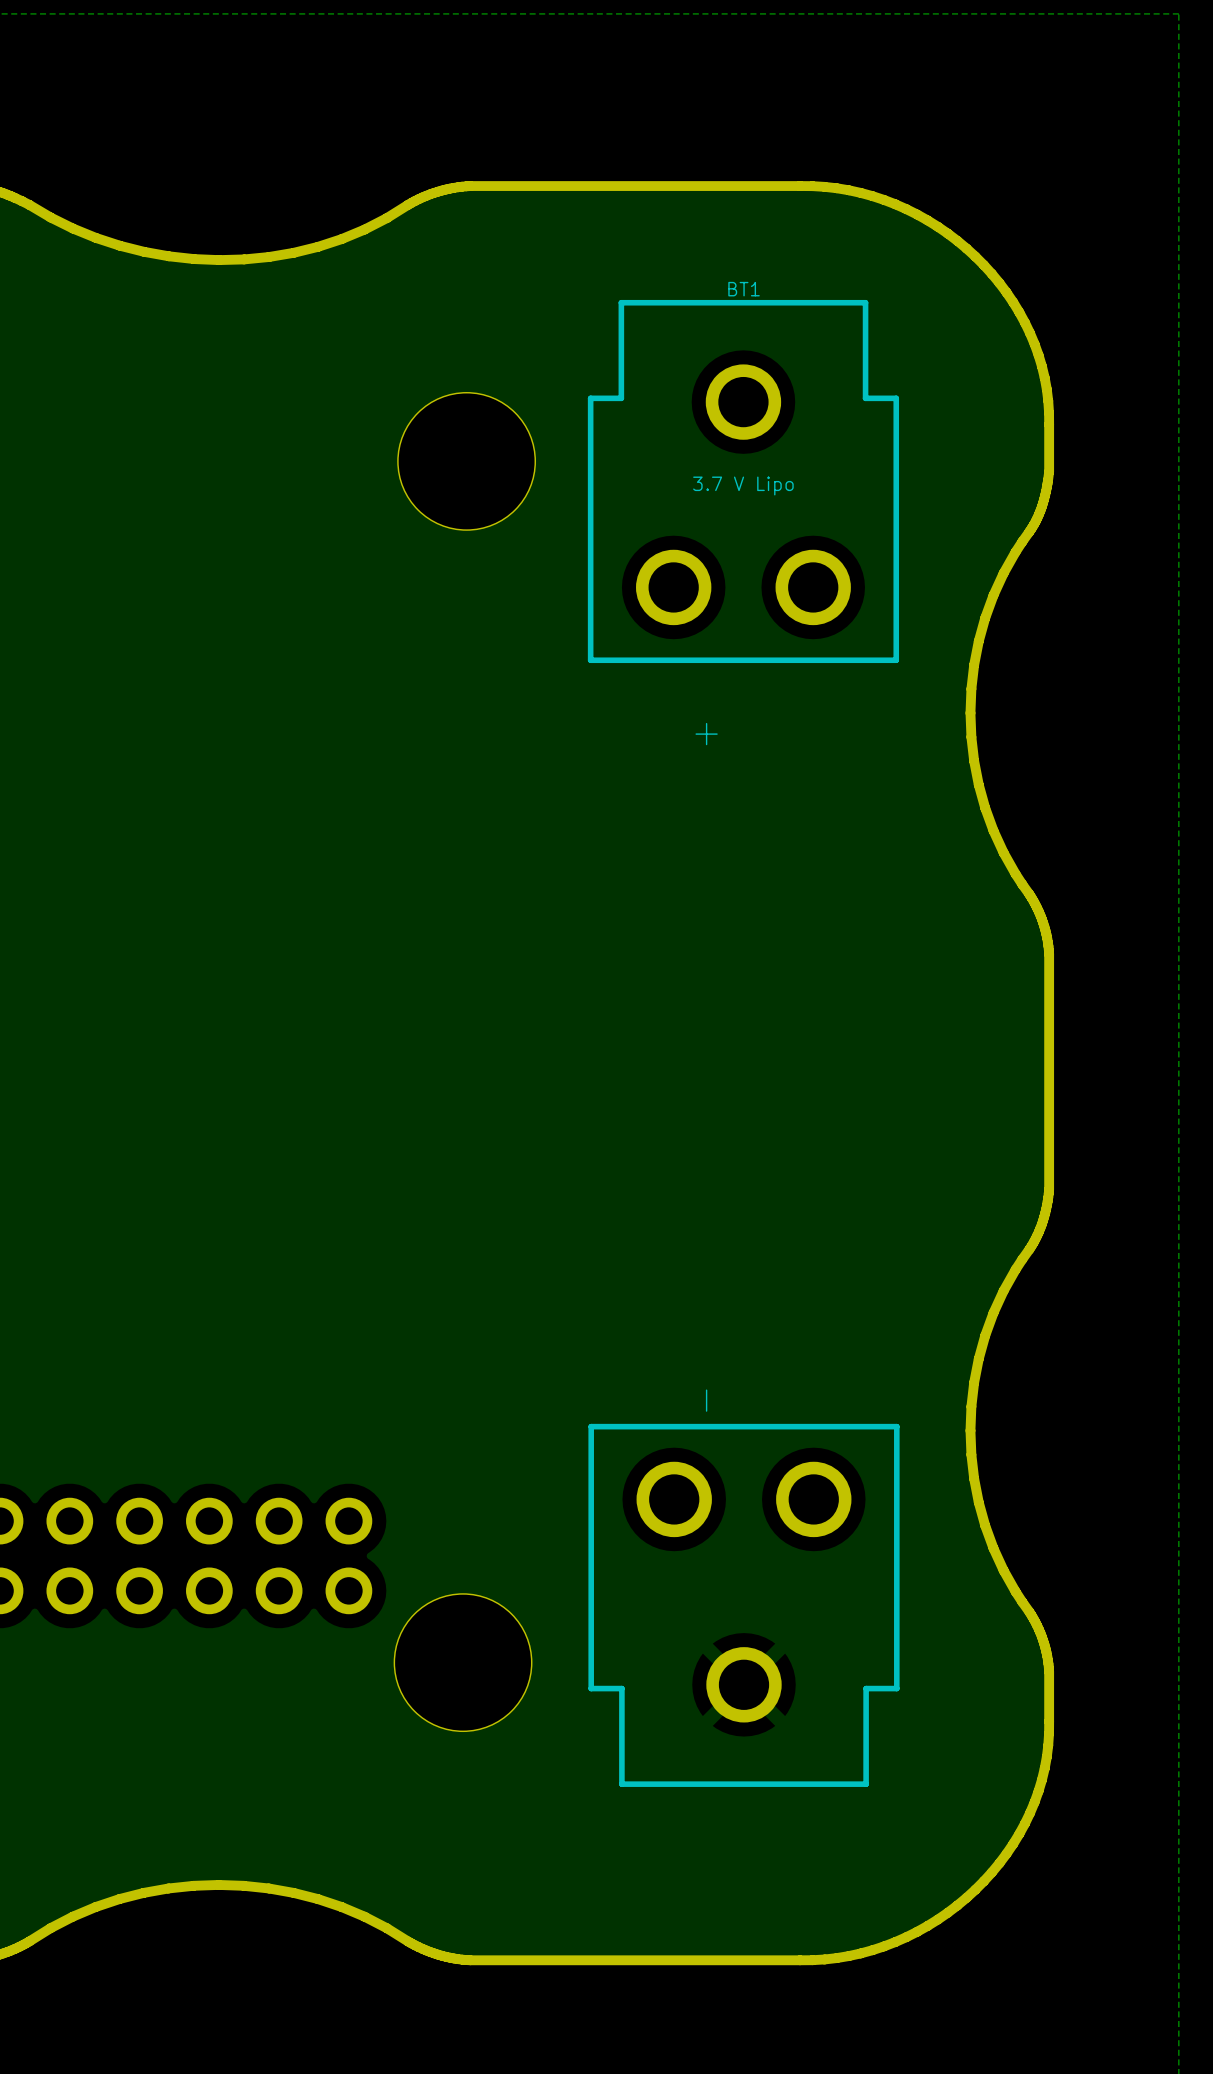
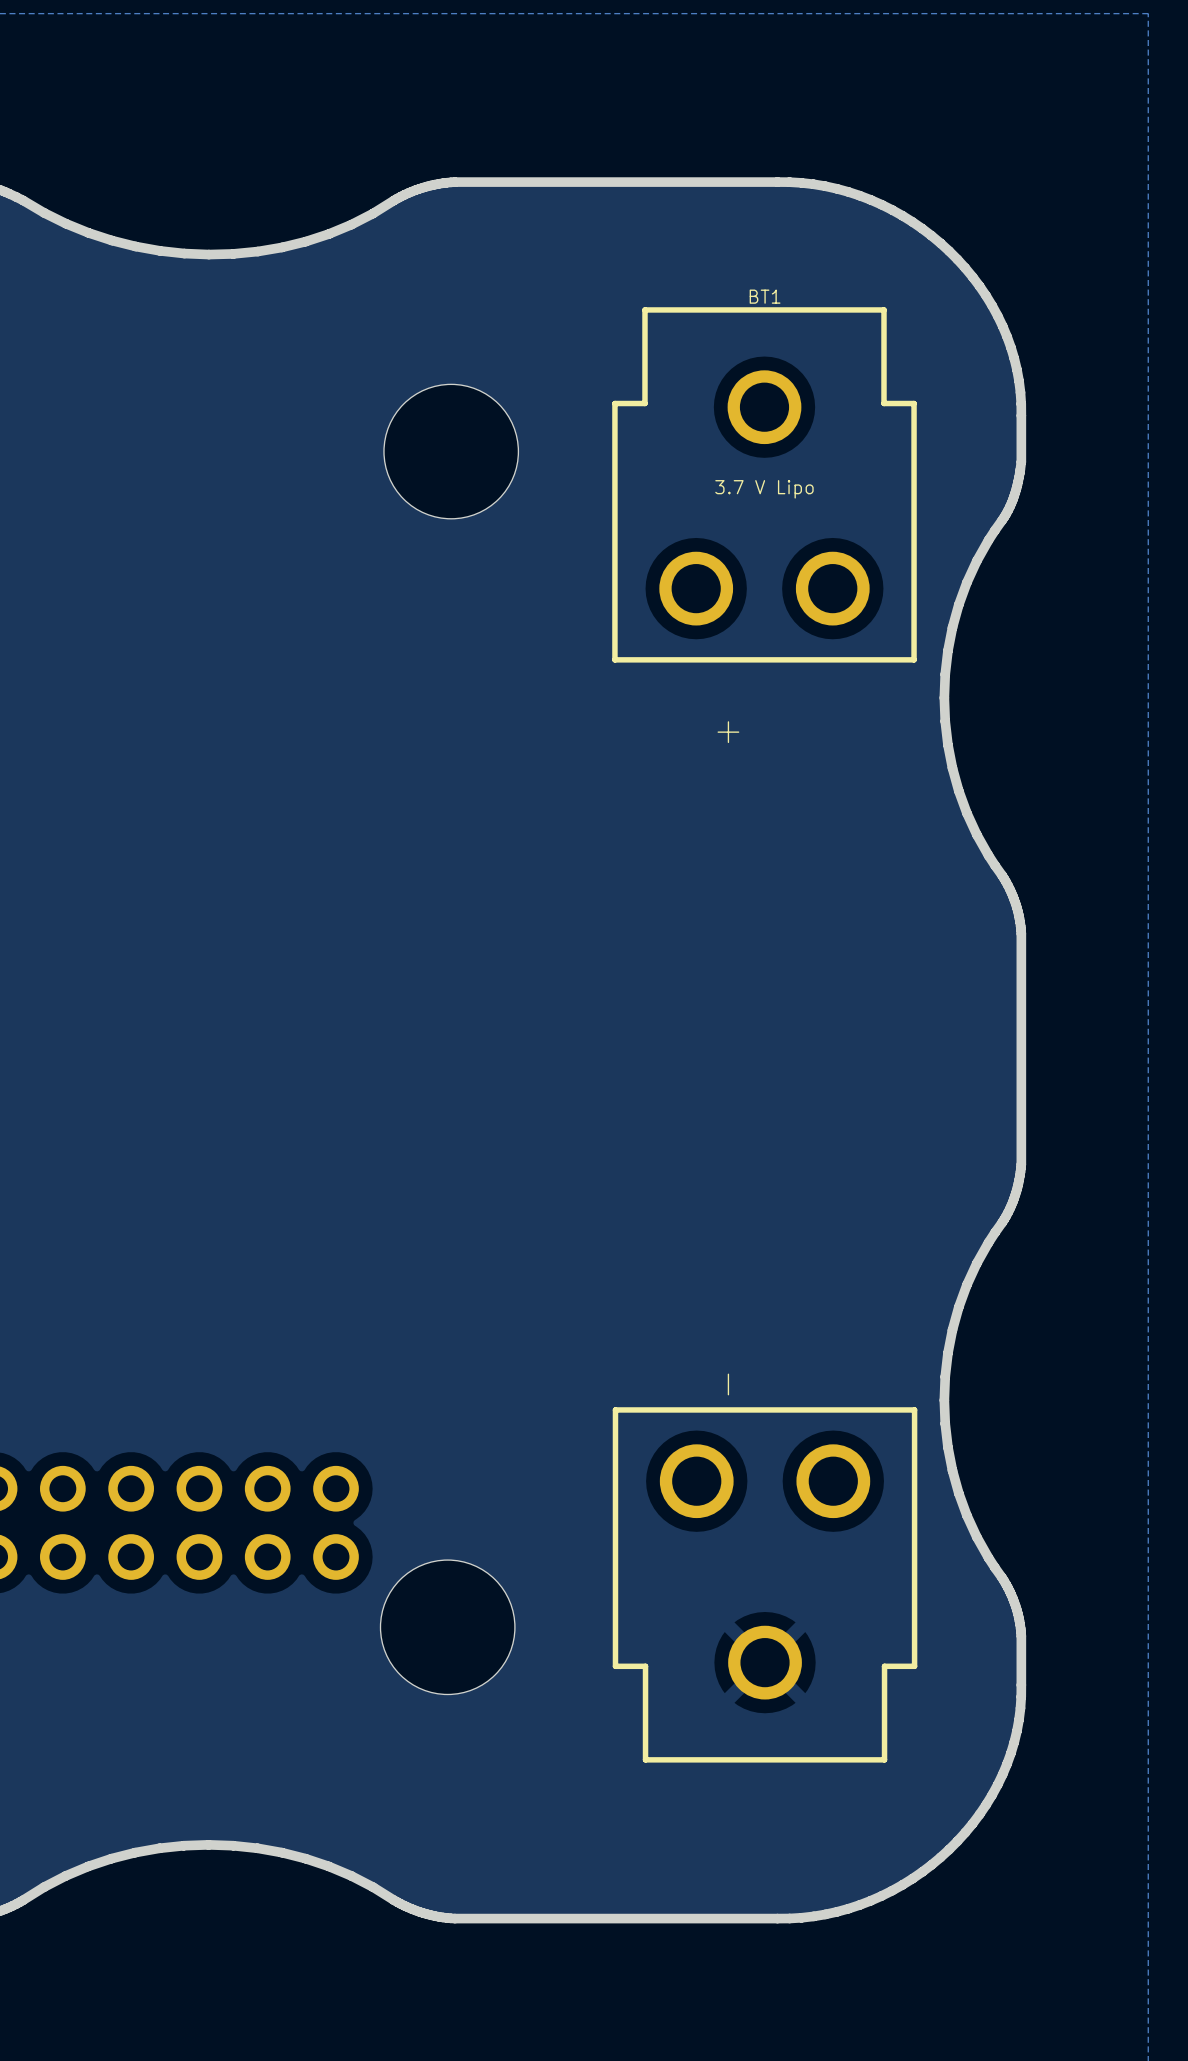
BT1 position: (743, 1043) -> (764, 1034)

